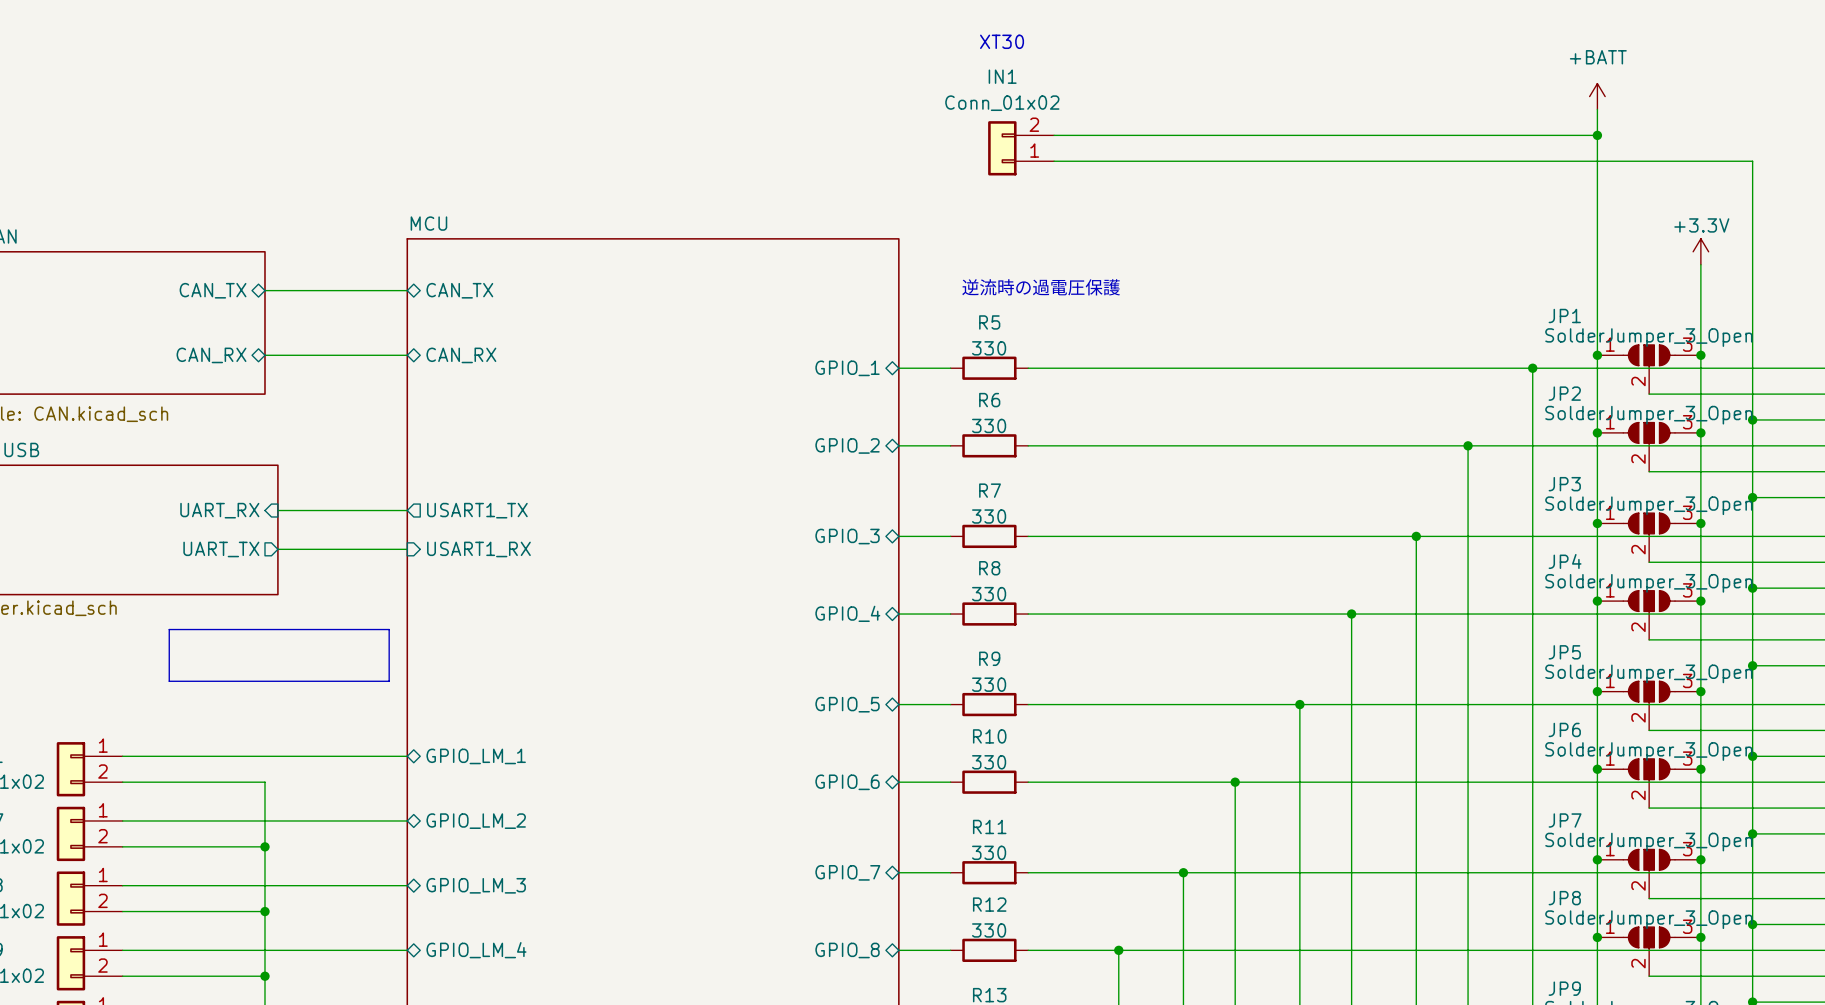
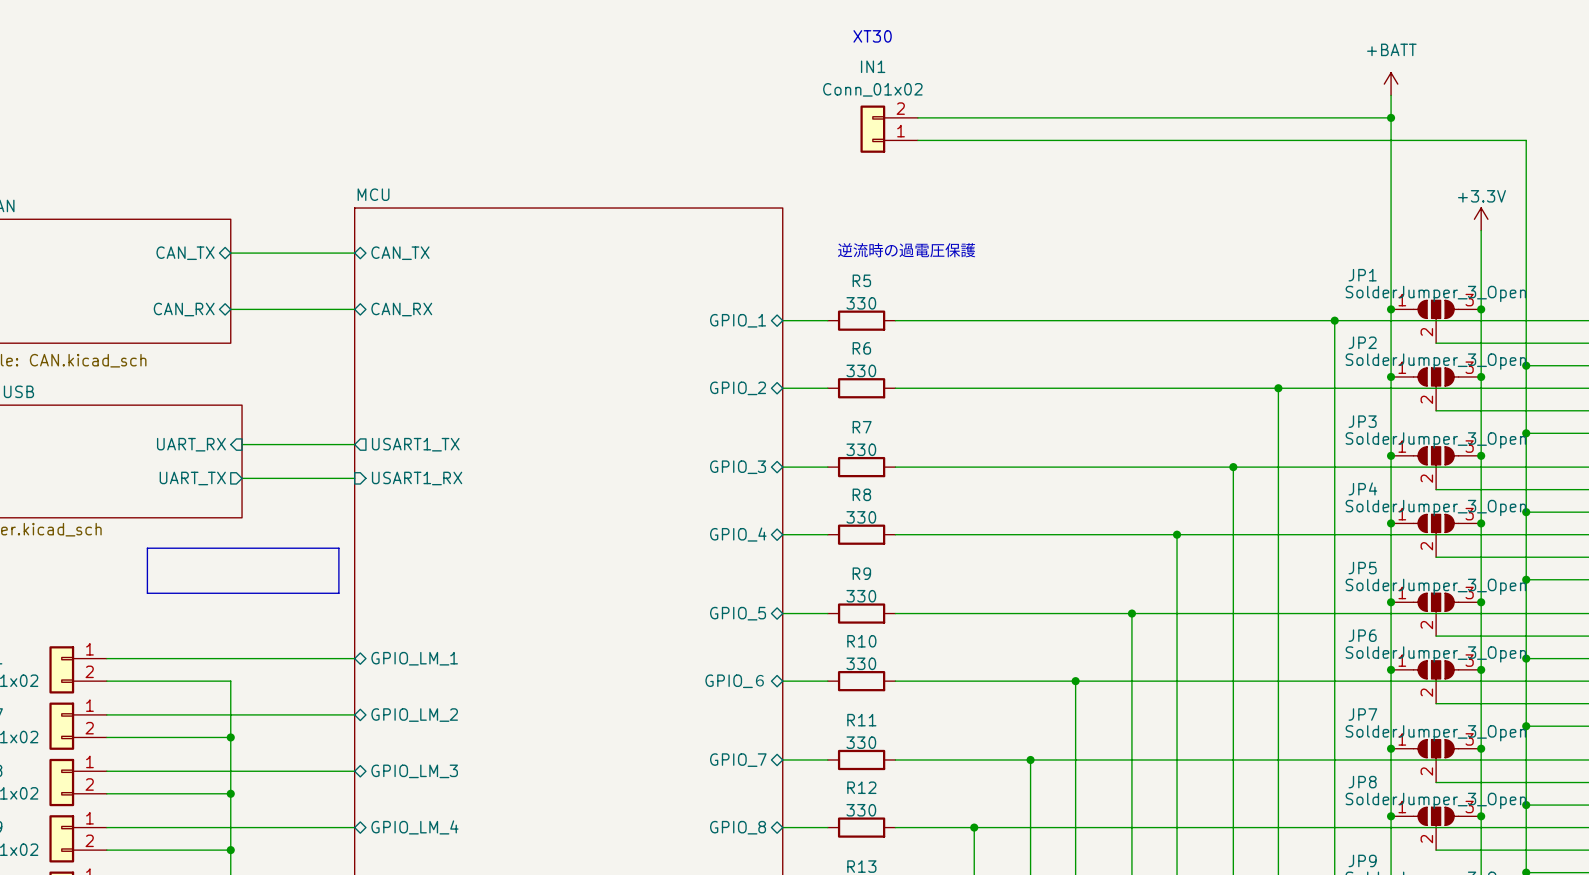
sheet pin: GPIO_6 (847, 782) -> GPIO_６ (734, 681)

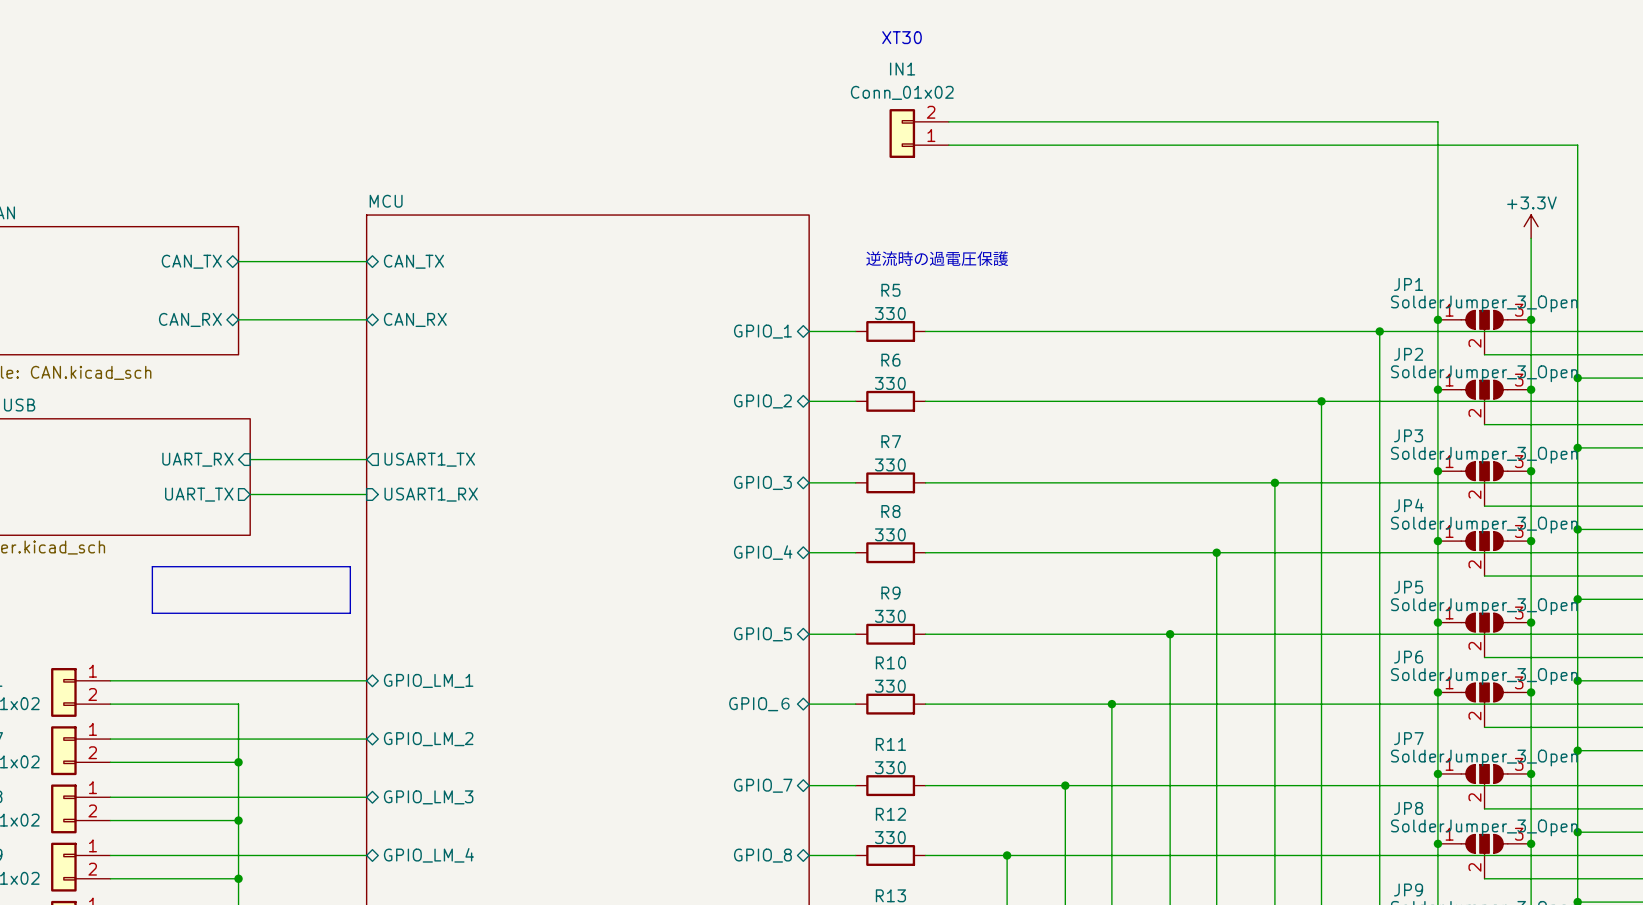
power symbol: +BATT (1391, 84) -> none
wire: (1391, 95) (1391, 117) -> none
junction: (1391, 117) -> none

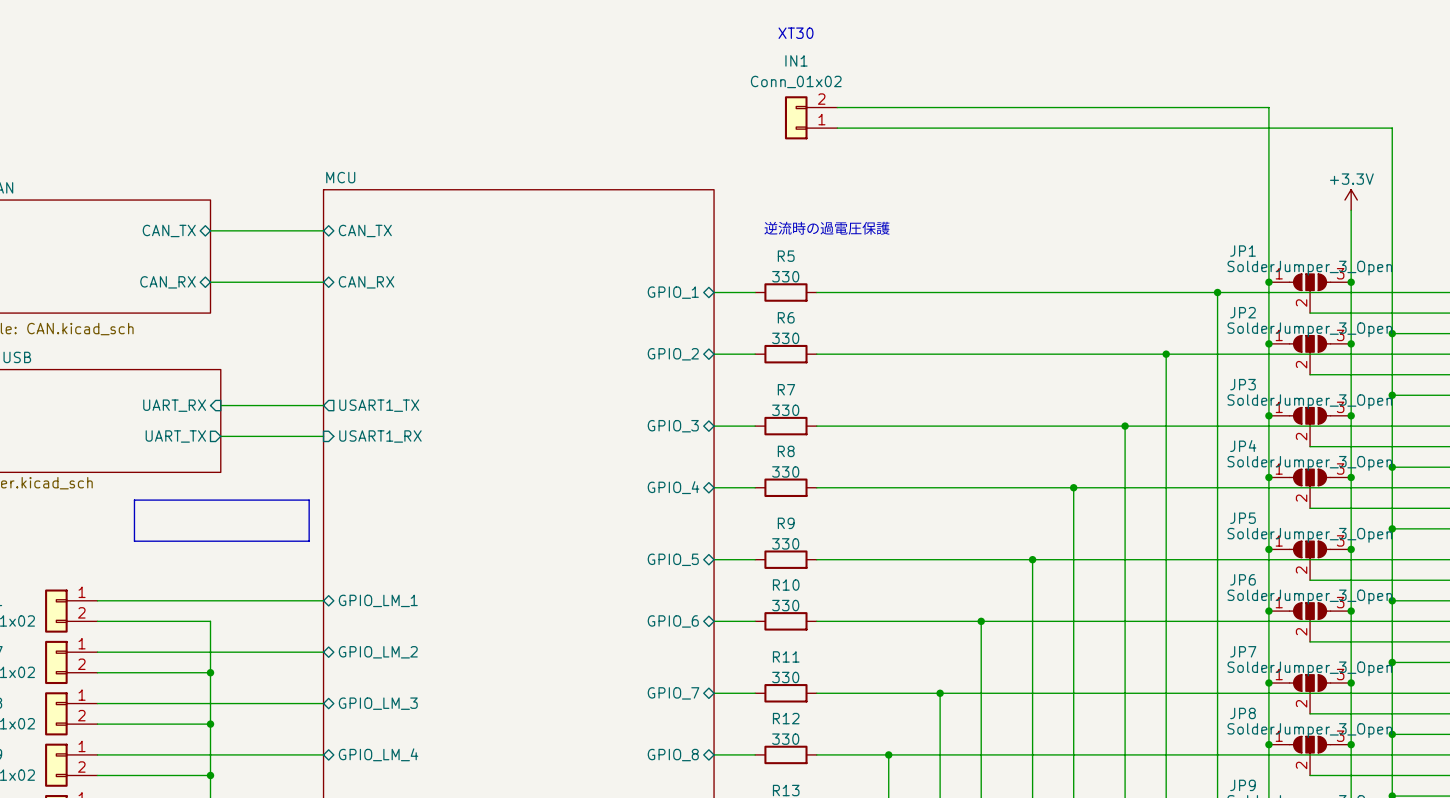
sheet pin: GPIO_６ (759, 704) -> GPIO_6 (673, 621)

